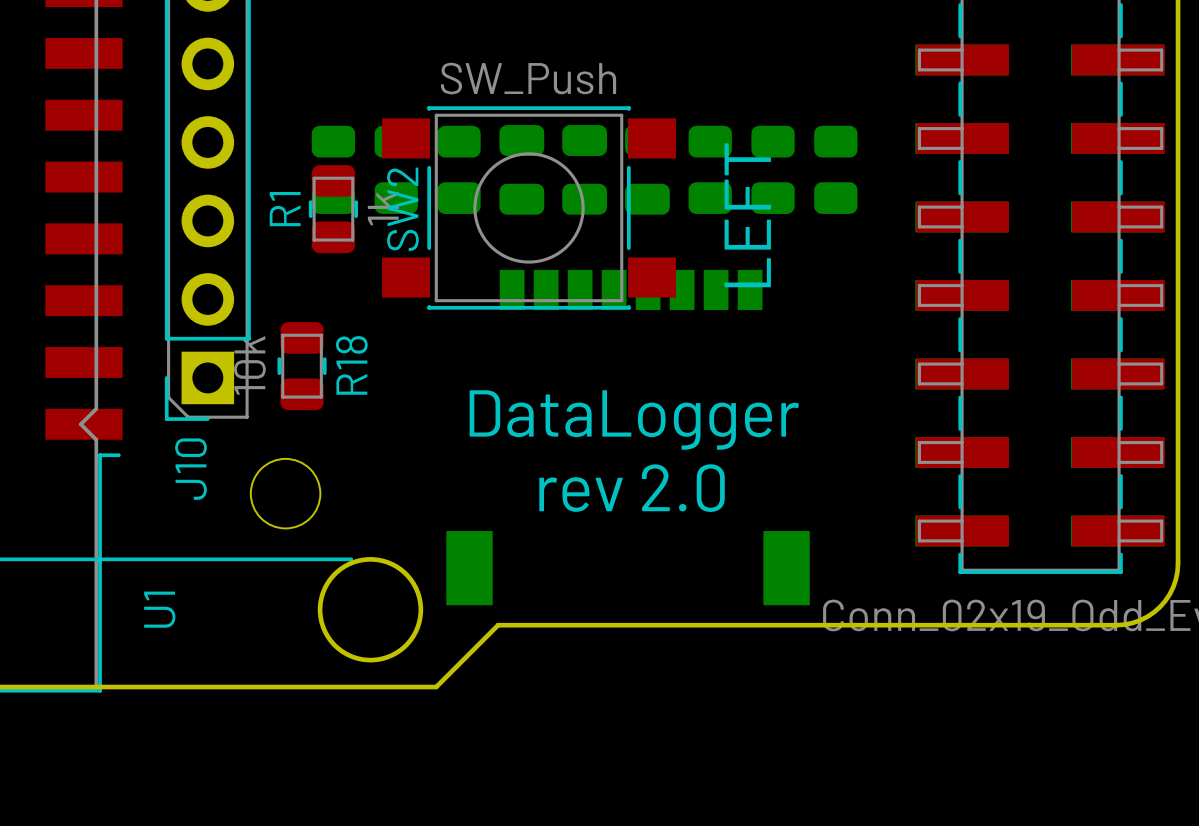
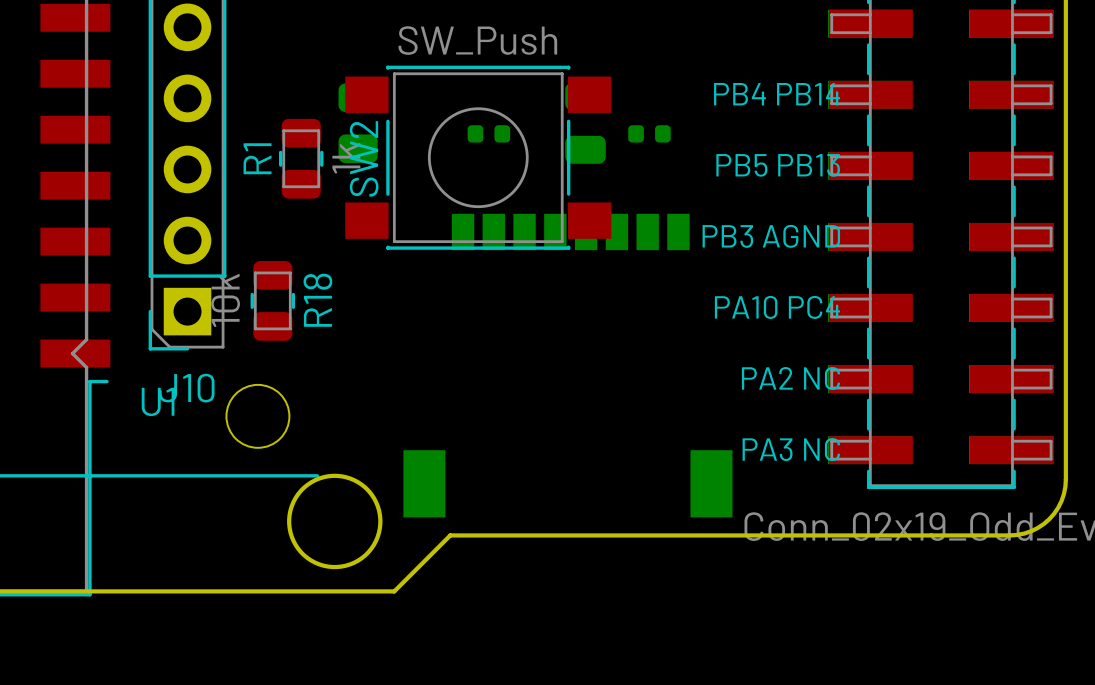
part footprint: [499, 125, 545, 215] -> [467, 125, 511, 143]
part footprint: [688, 125, 732, 214] -> [628, 125, 671, 143]
text: none -> PB4 PB14 (777, 94)
part: (333, 169) -> none
part: (459, 169) -> none
part: (584, 169) -> none
part: (773, 169) -> none
part: (835, 169) -> none
text: LEFT (747, 215) -> none
text: none -> PB5 PB13 (778, 165)
text: none -> PB3 AGND (771, 236)
text: none -> PA10 PC4 (777, 307)
text: DataLogger (634, 420) -> none
text: none -> PA2 NC (790, 378)
J10 name rotation: 0° (191, 469) -> 90° clockwise (186, 388)
text: rev 2.0 (632, 488) -> none
text: none -> PA3 NC (791, 449)
U1 name rotation: 0° (159, 609) -> 90° clockwise (158, 401)
U1 name position: U1 (159, 609) -> U1 (158, 401)

